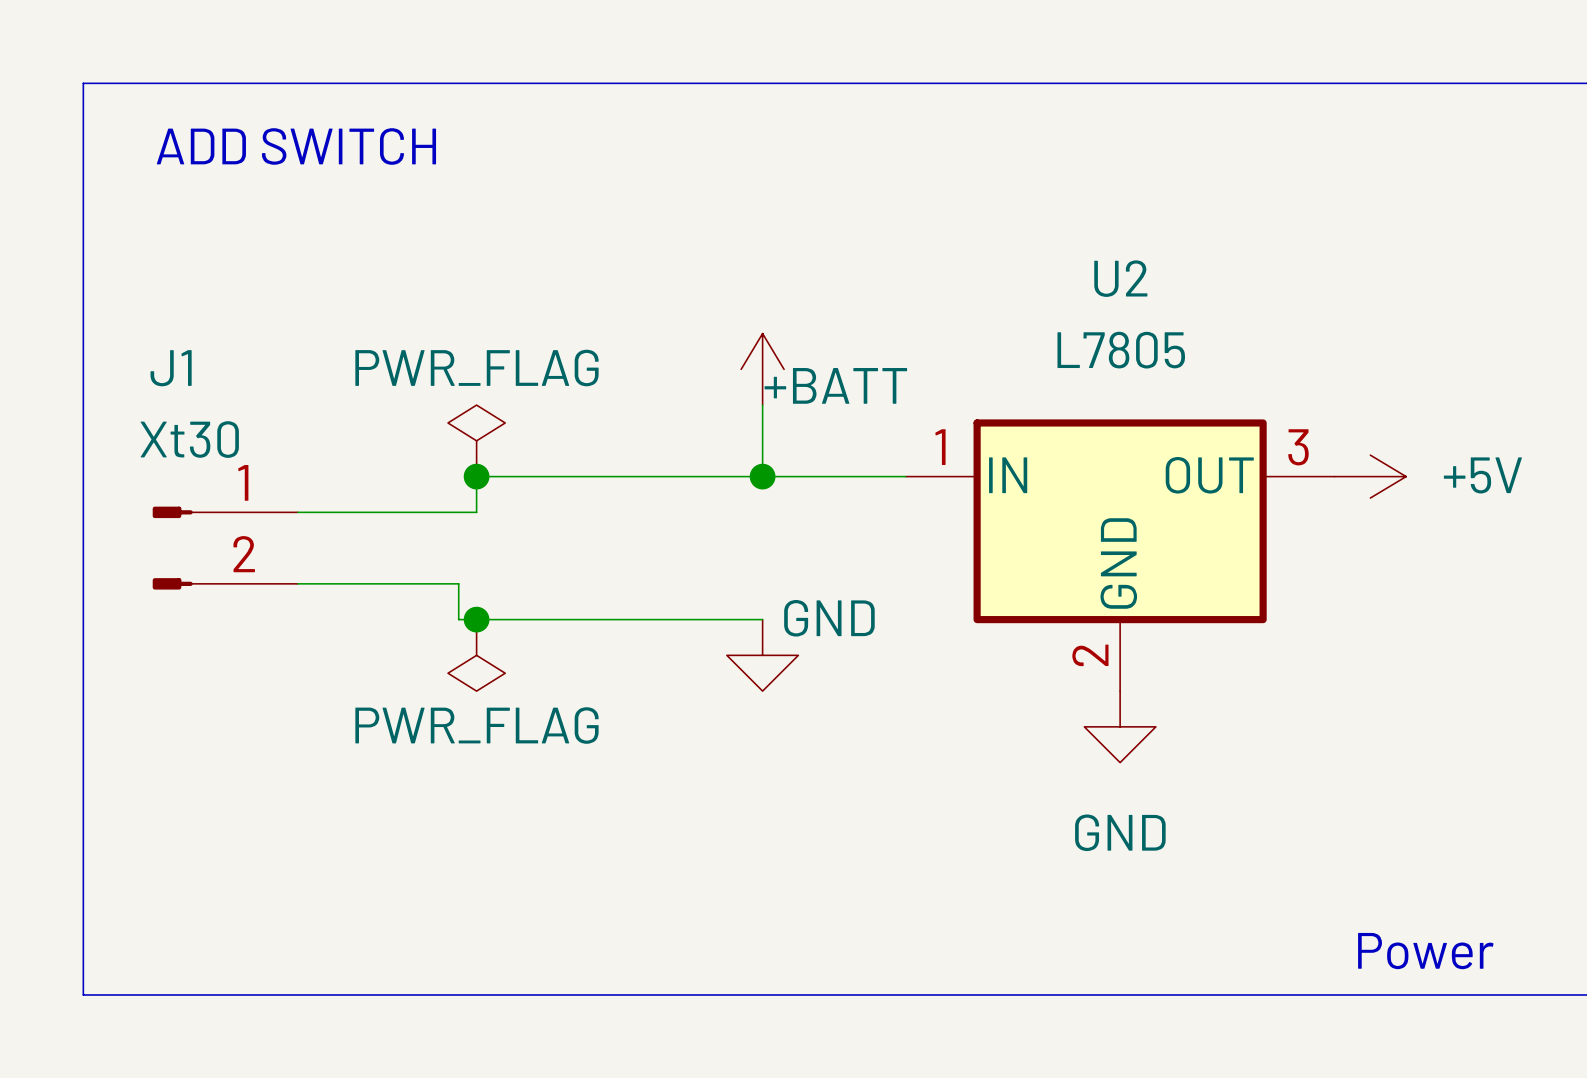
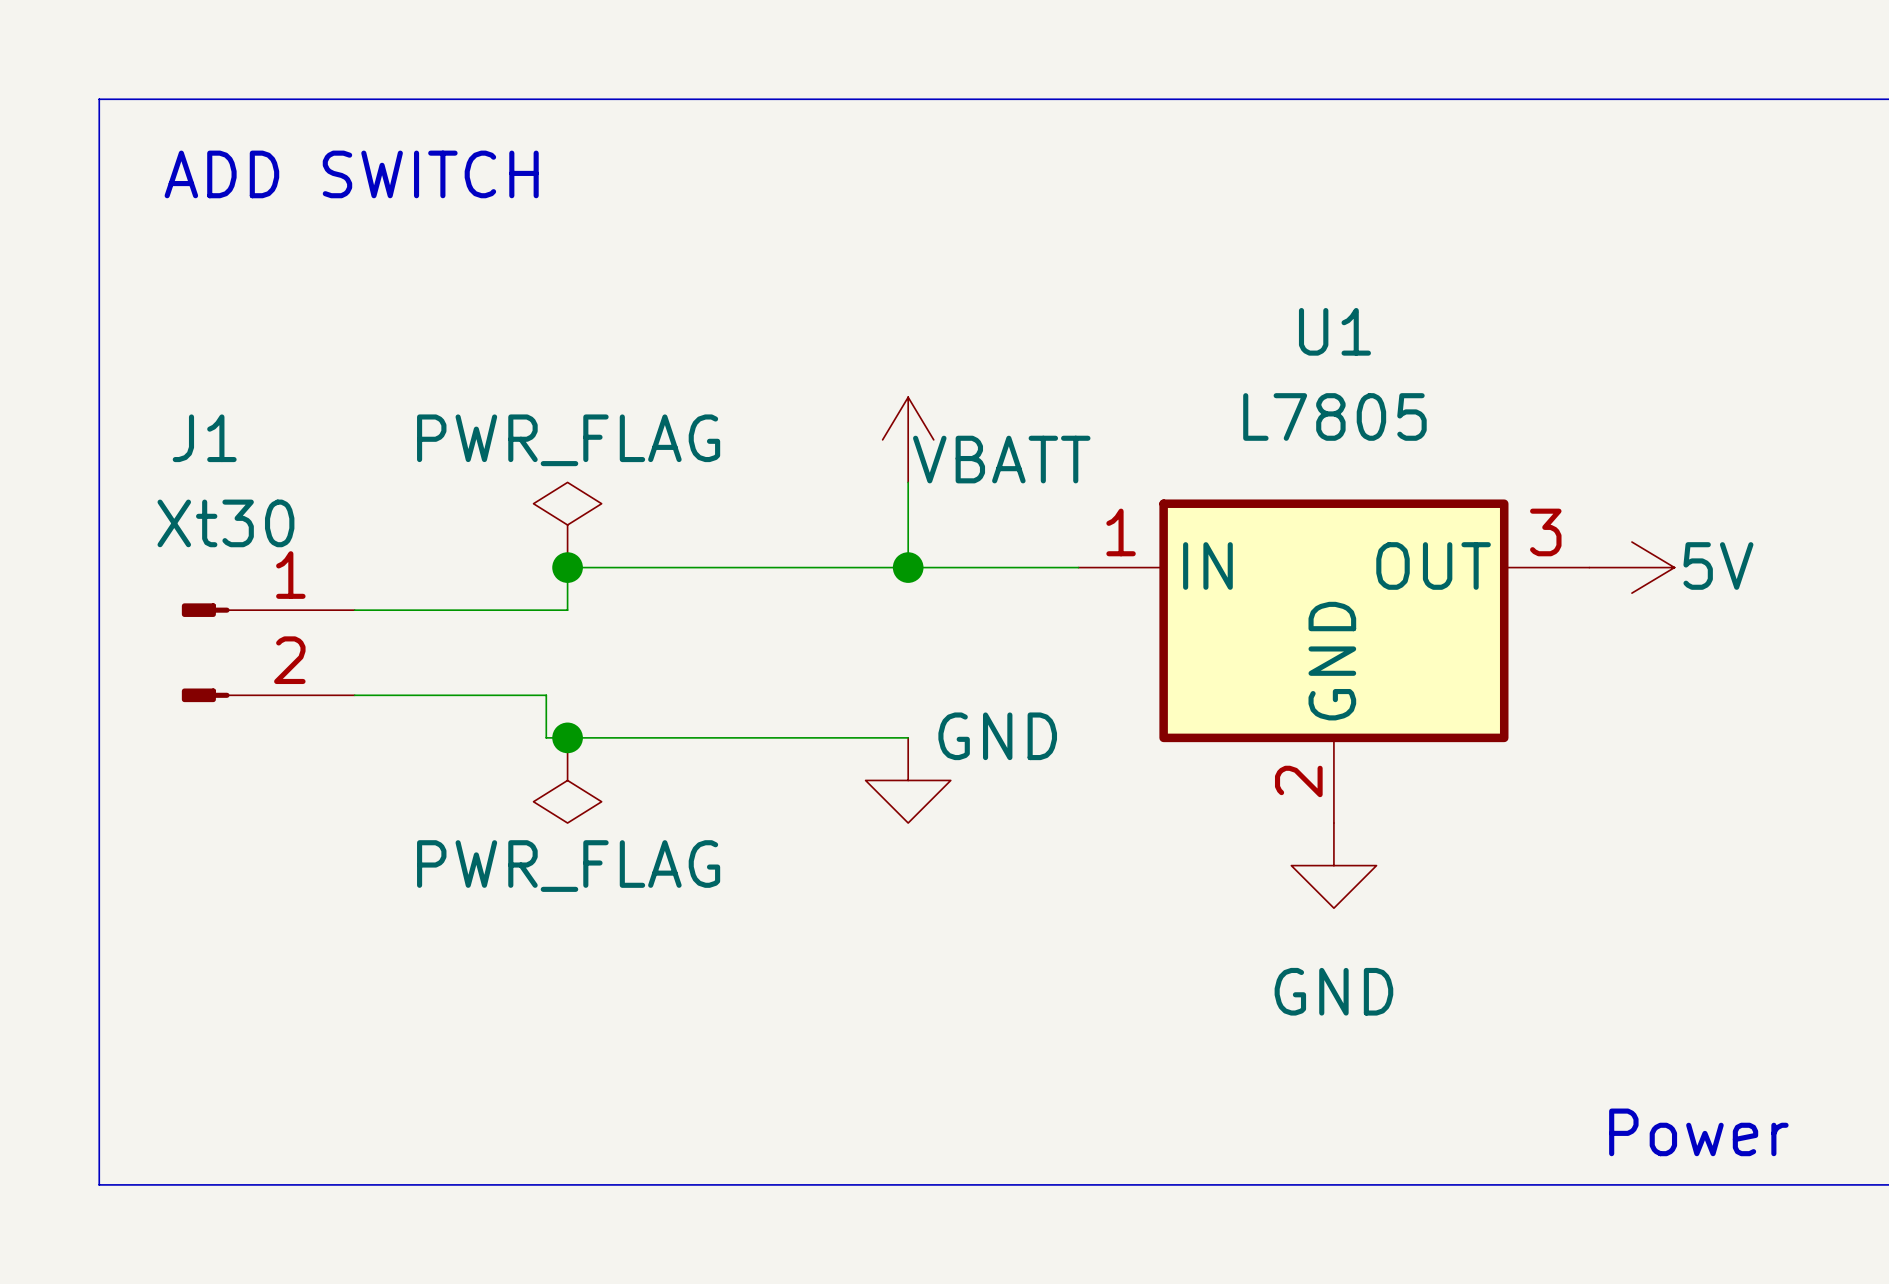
U2 name: U2 (1120, 278) -> U1 (1334, 331)
power symbol: +BATT (762, 369) -> VBATT (908, 439)
power symbol: +5V (1370, 476) -> 5V (1631, 567)

